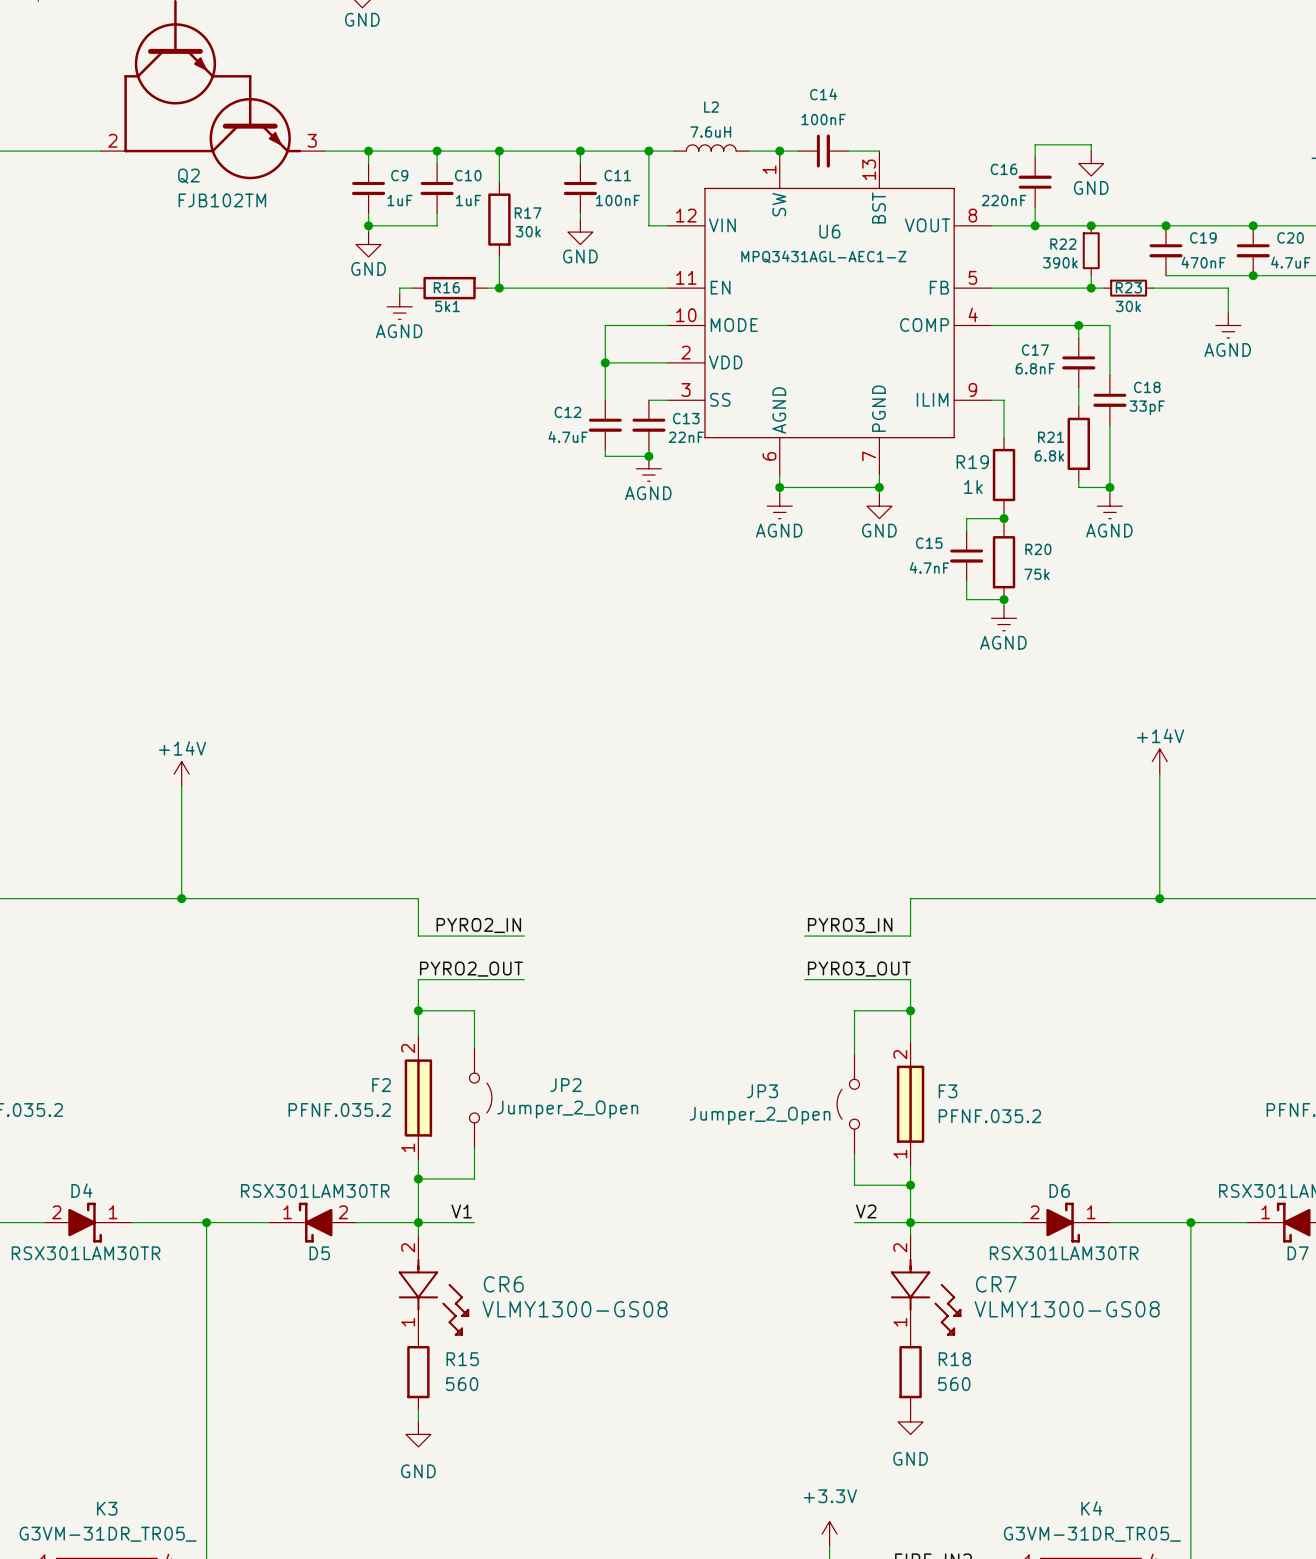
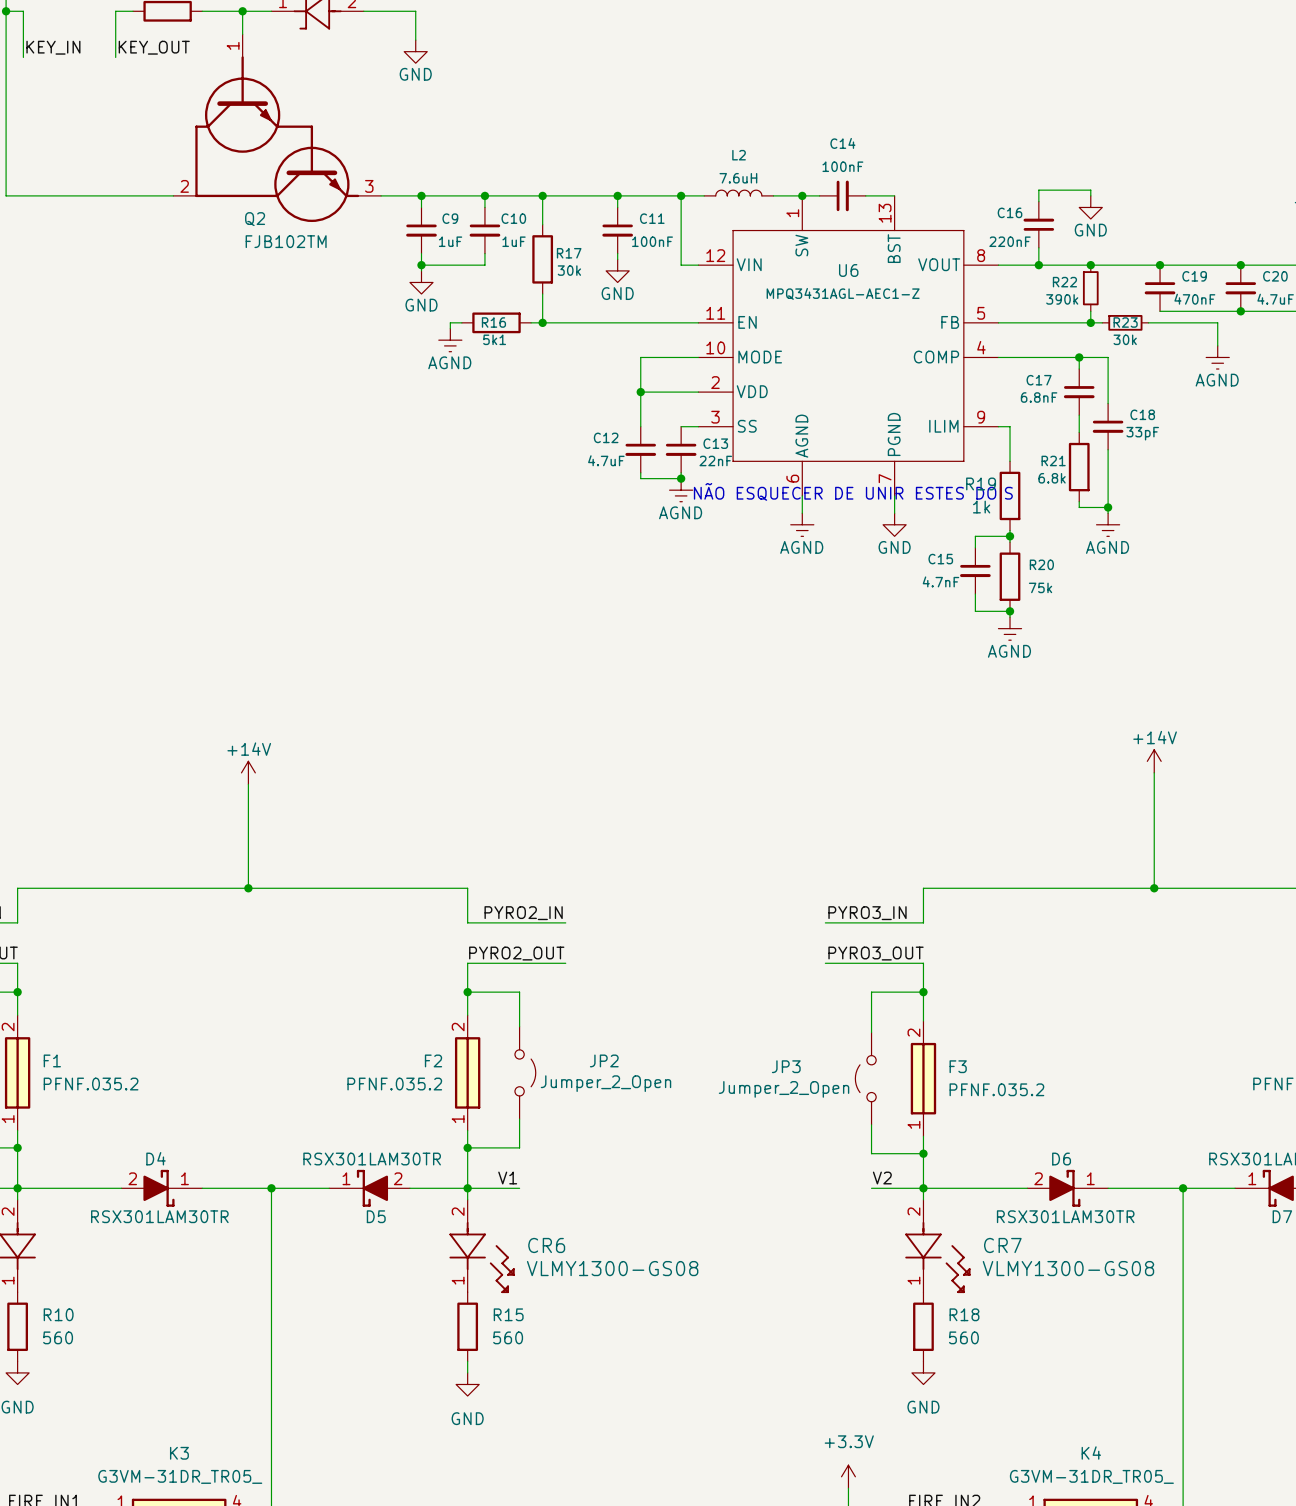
text: none -> NÃO ESQUECER DE UNIR ESTES DOIS (853, 491)
wire: (779, 487) (879, 487) -> none
junction: (779, 487) -> none
junction: (879, 487) -> none

